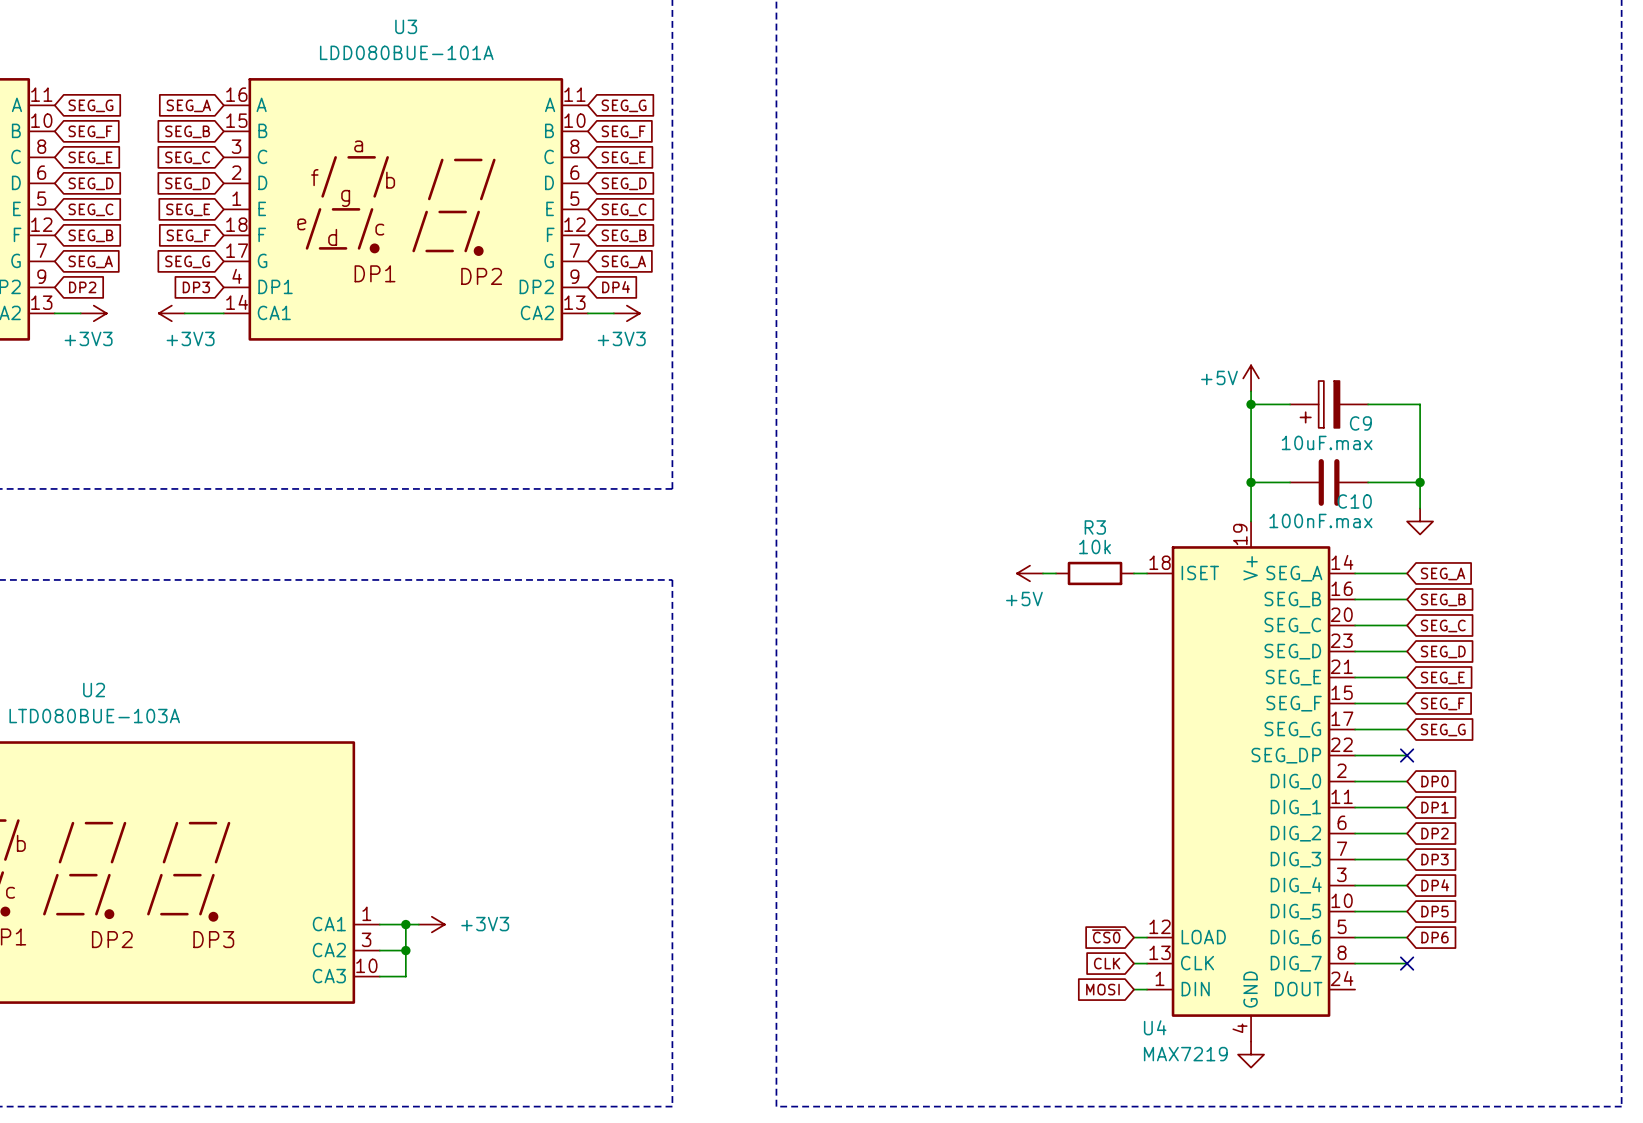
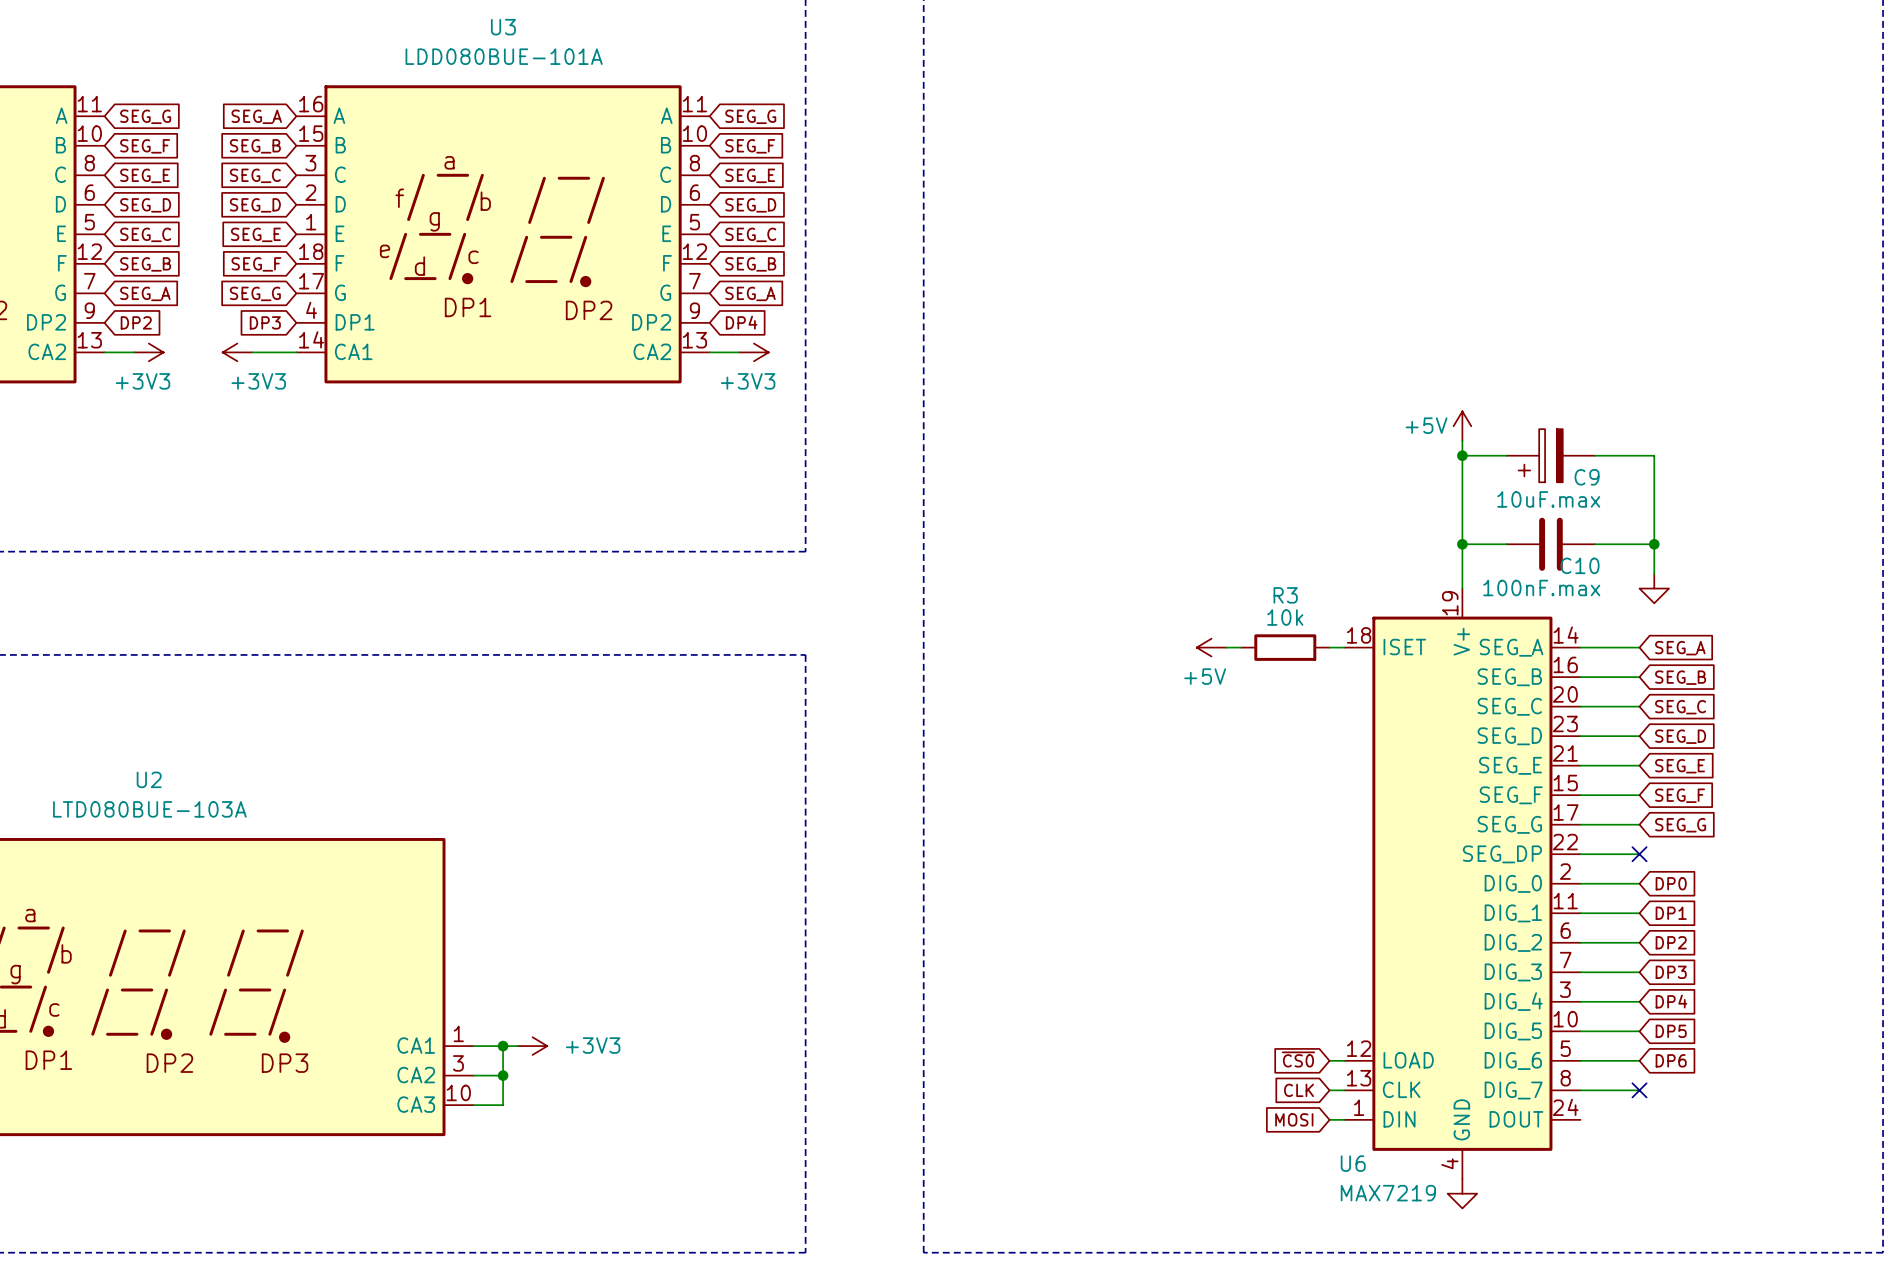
U4 name: U4 (1155, 1027) -> U6 (1353, 1163)

